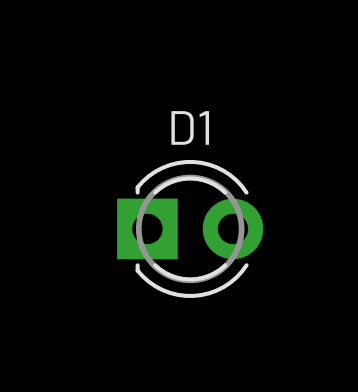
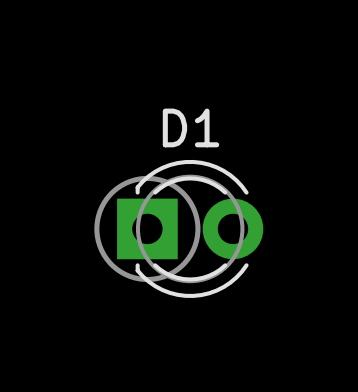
D1 footprint: [117, 159, 264, 298] -> [94, 159, 264, 298]

